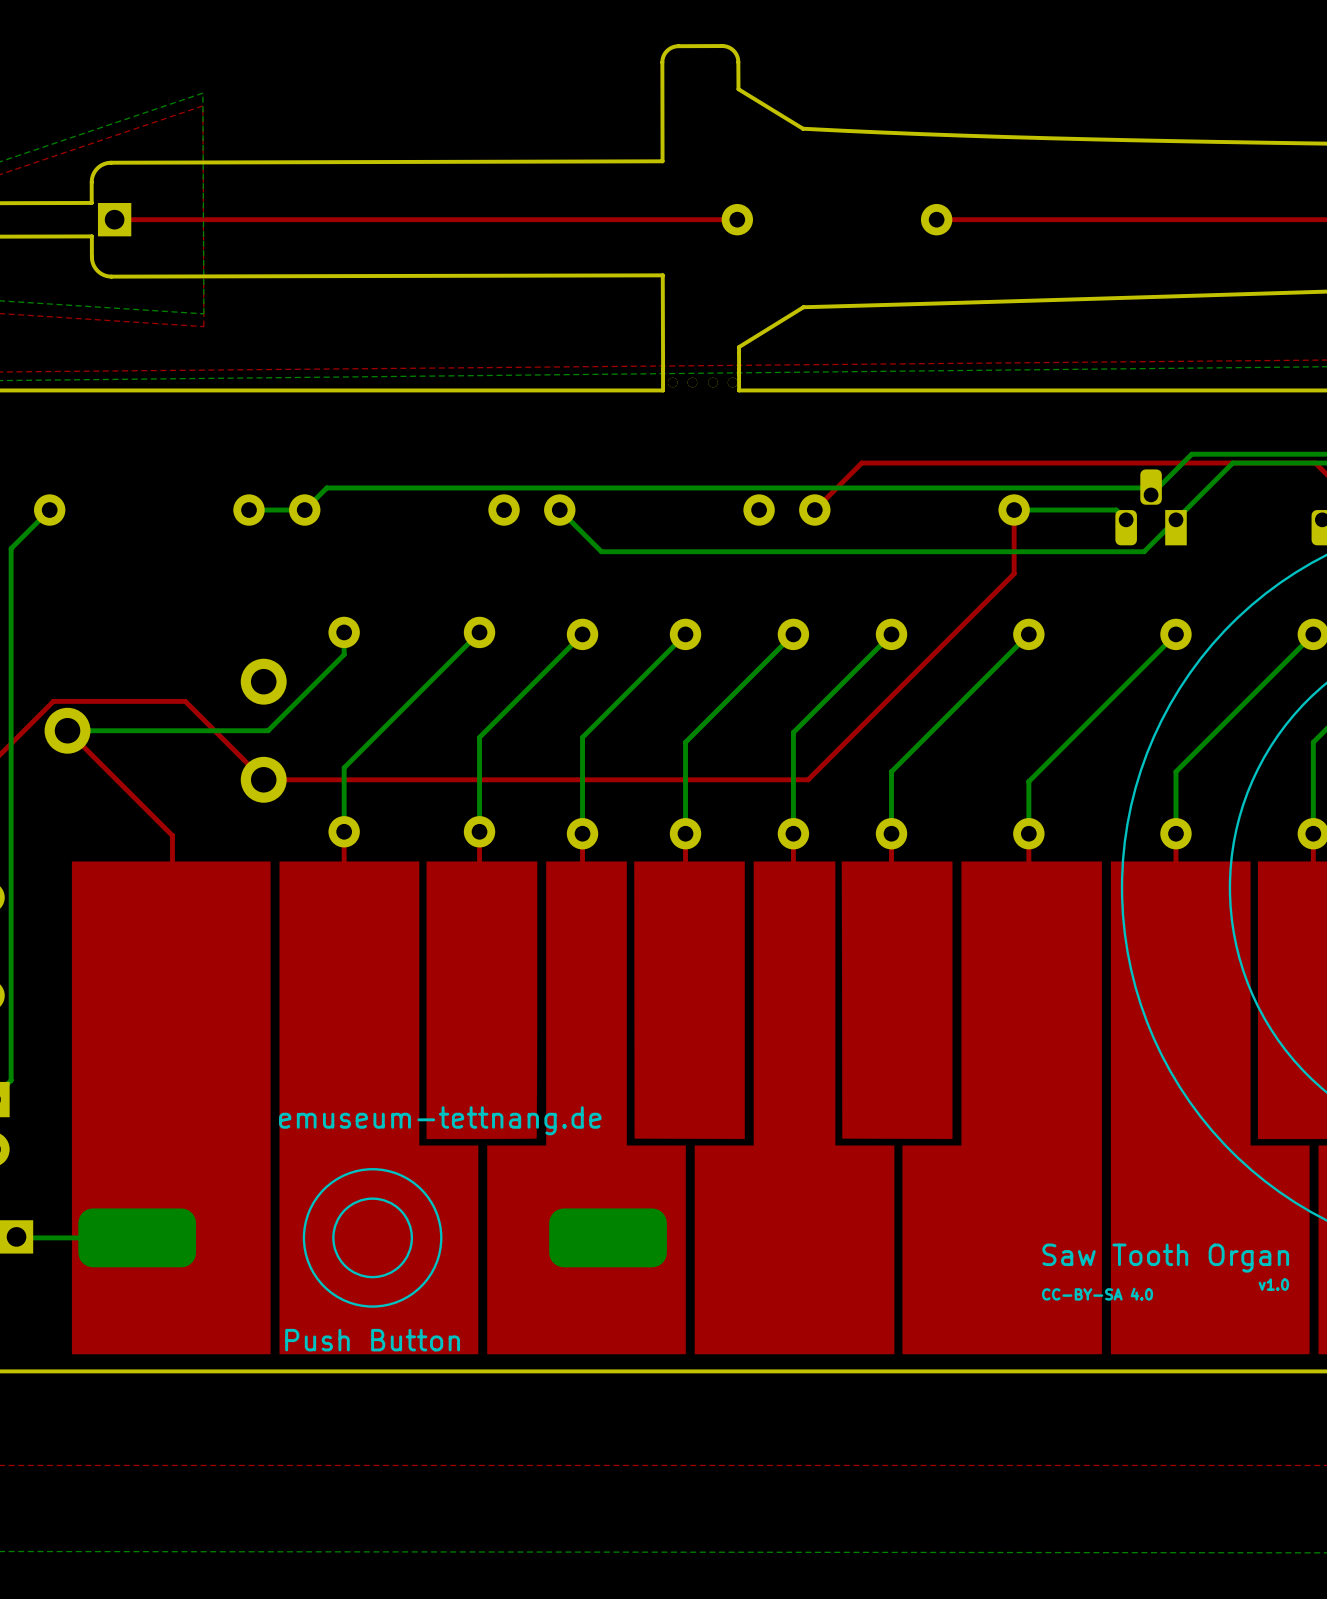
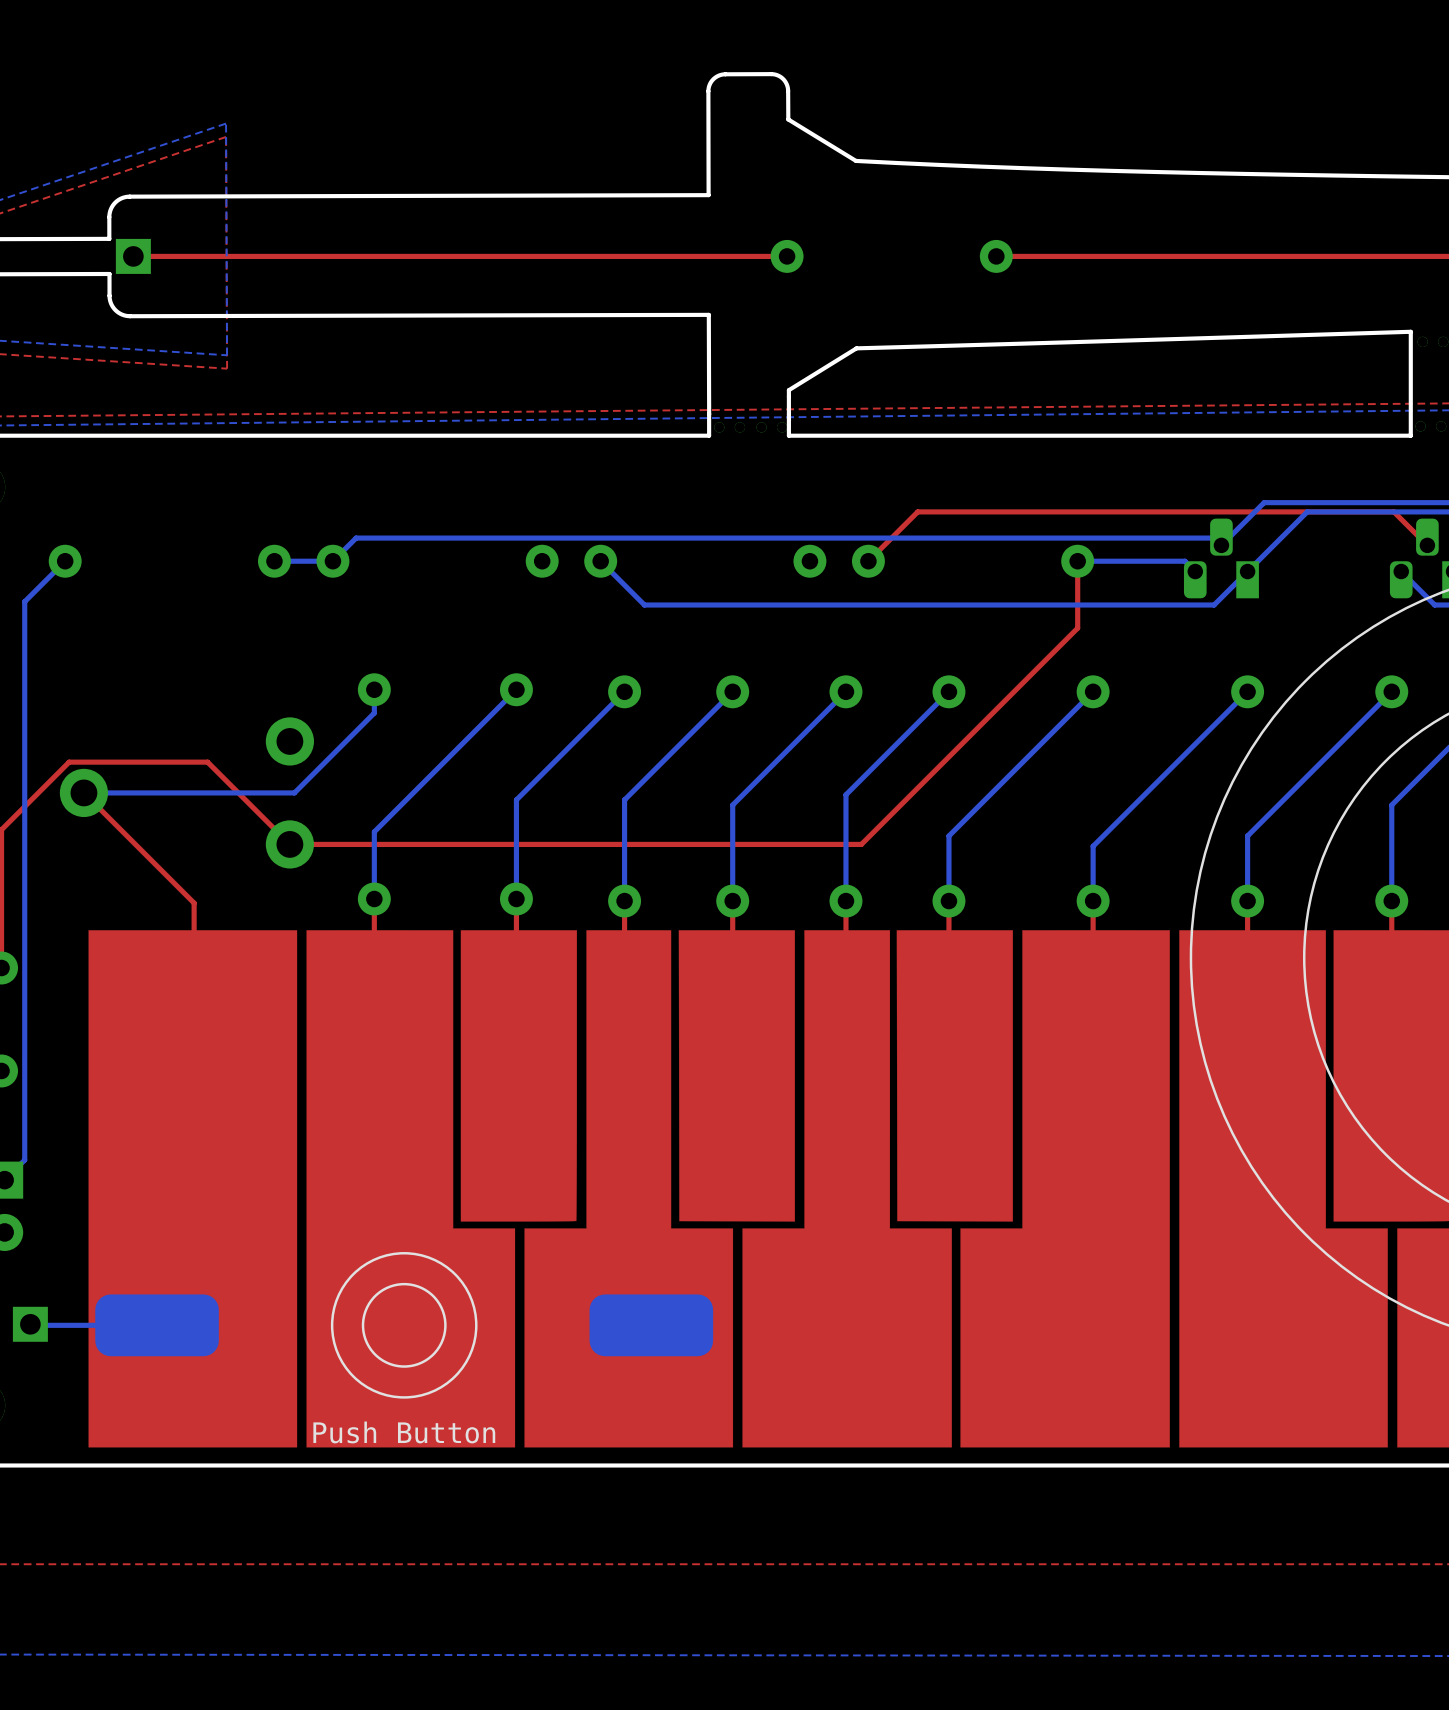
text: emuseum-tettnang.de (440, 1120) -> none
text: Saw Tooth Organ (1165, 1258) -> none
text: v1.0 (1273, 1284) -> none
text: CC-BY-SA 4.0 (1097, 1294) -> none

